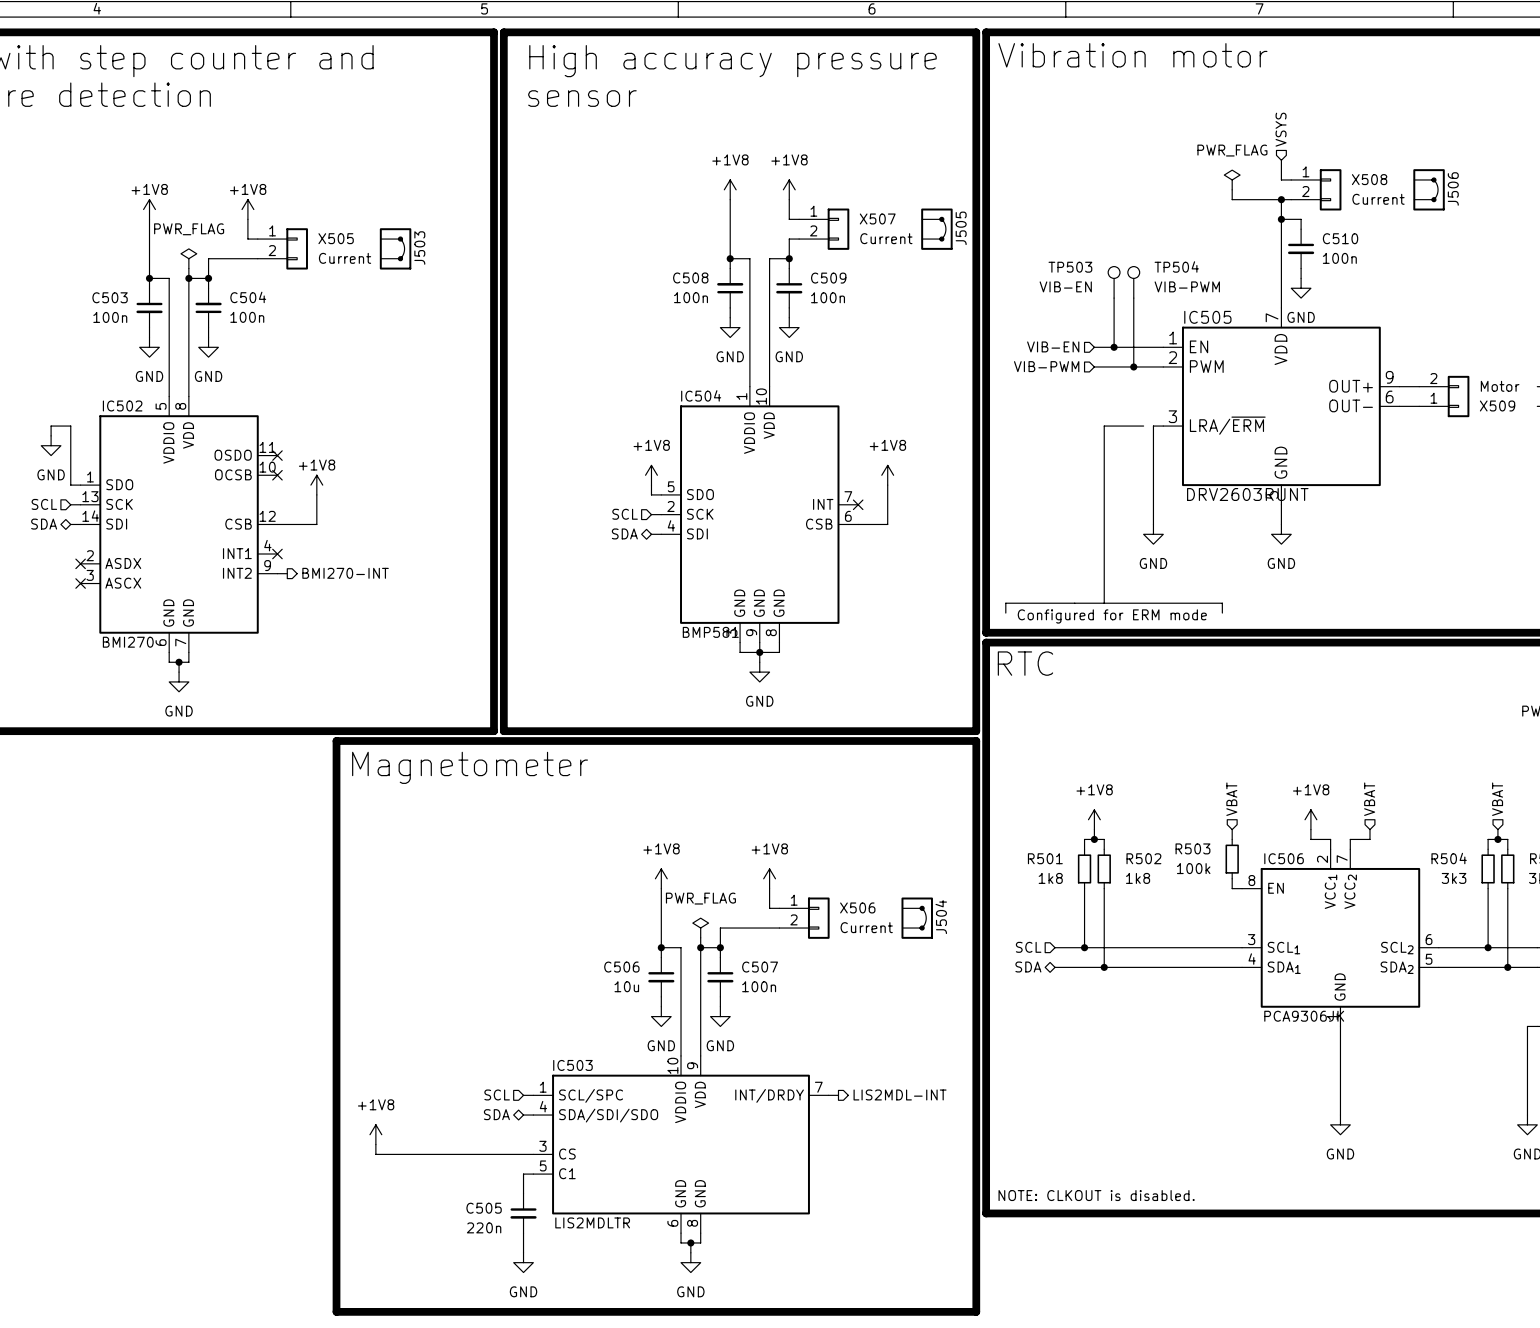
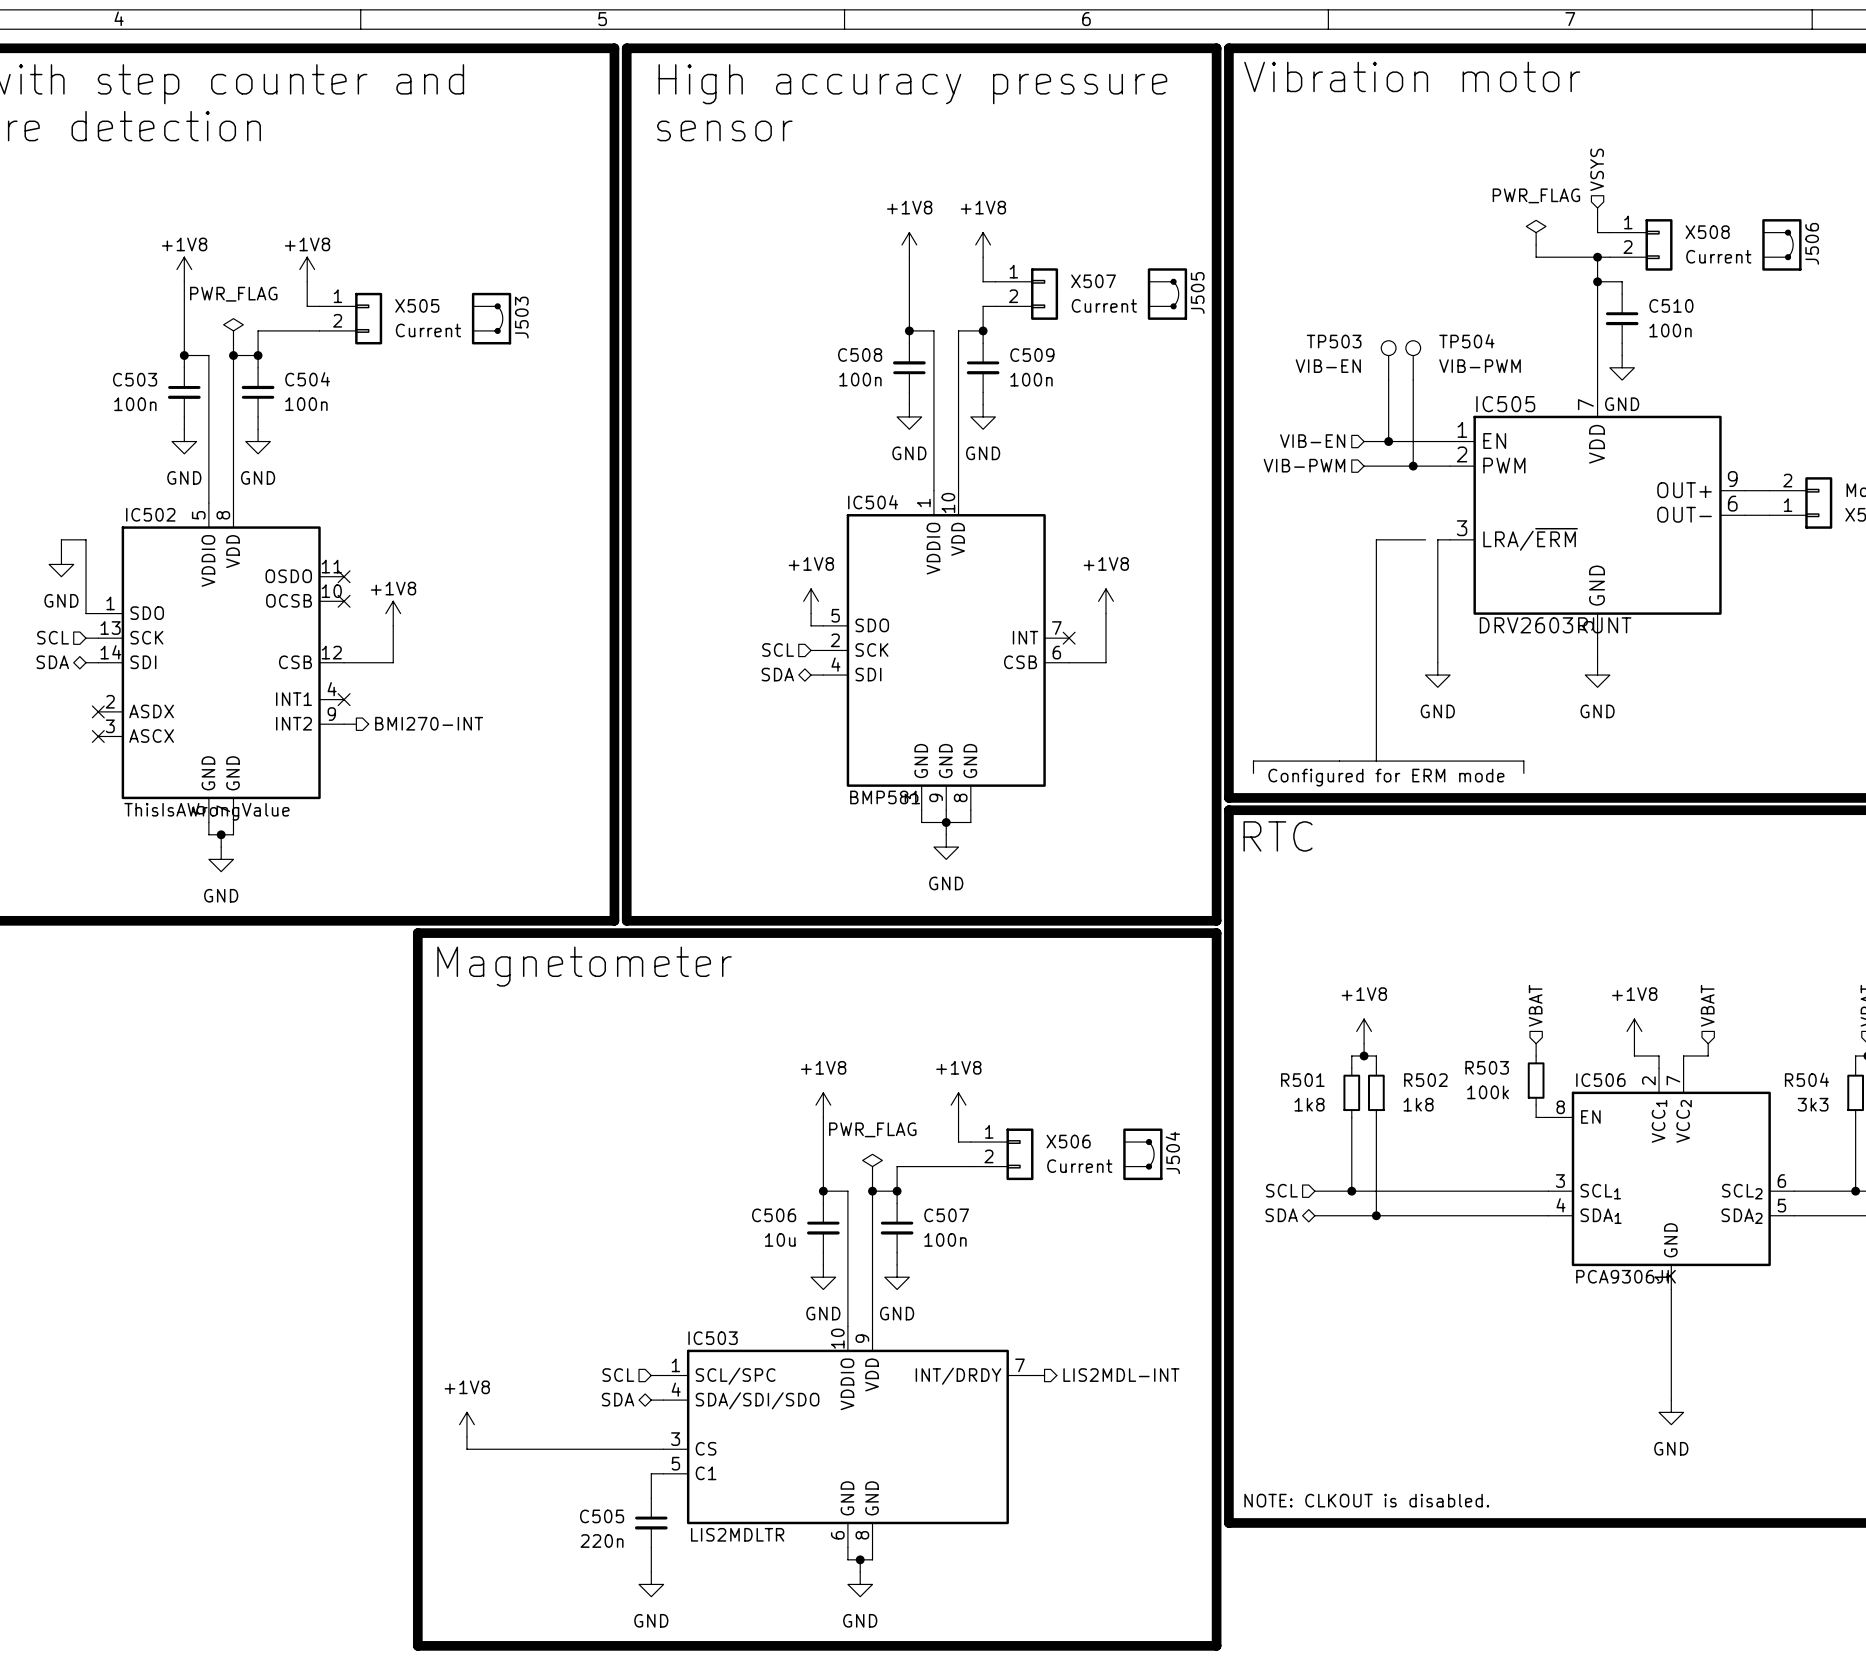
IC502 value: BMI270 (128, 642) -> ThisIsAWrongValue (206, 811)

